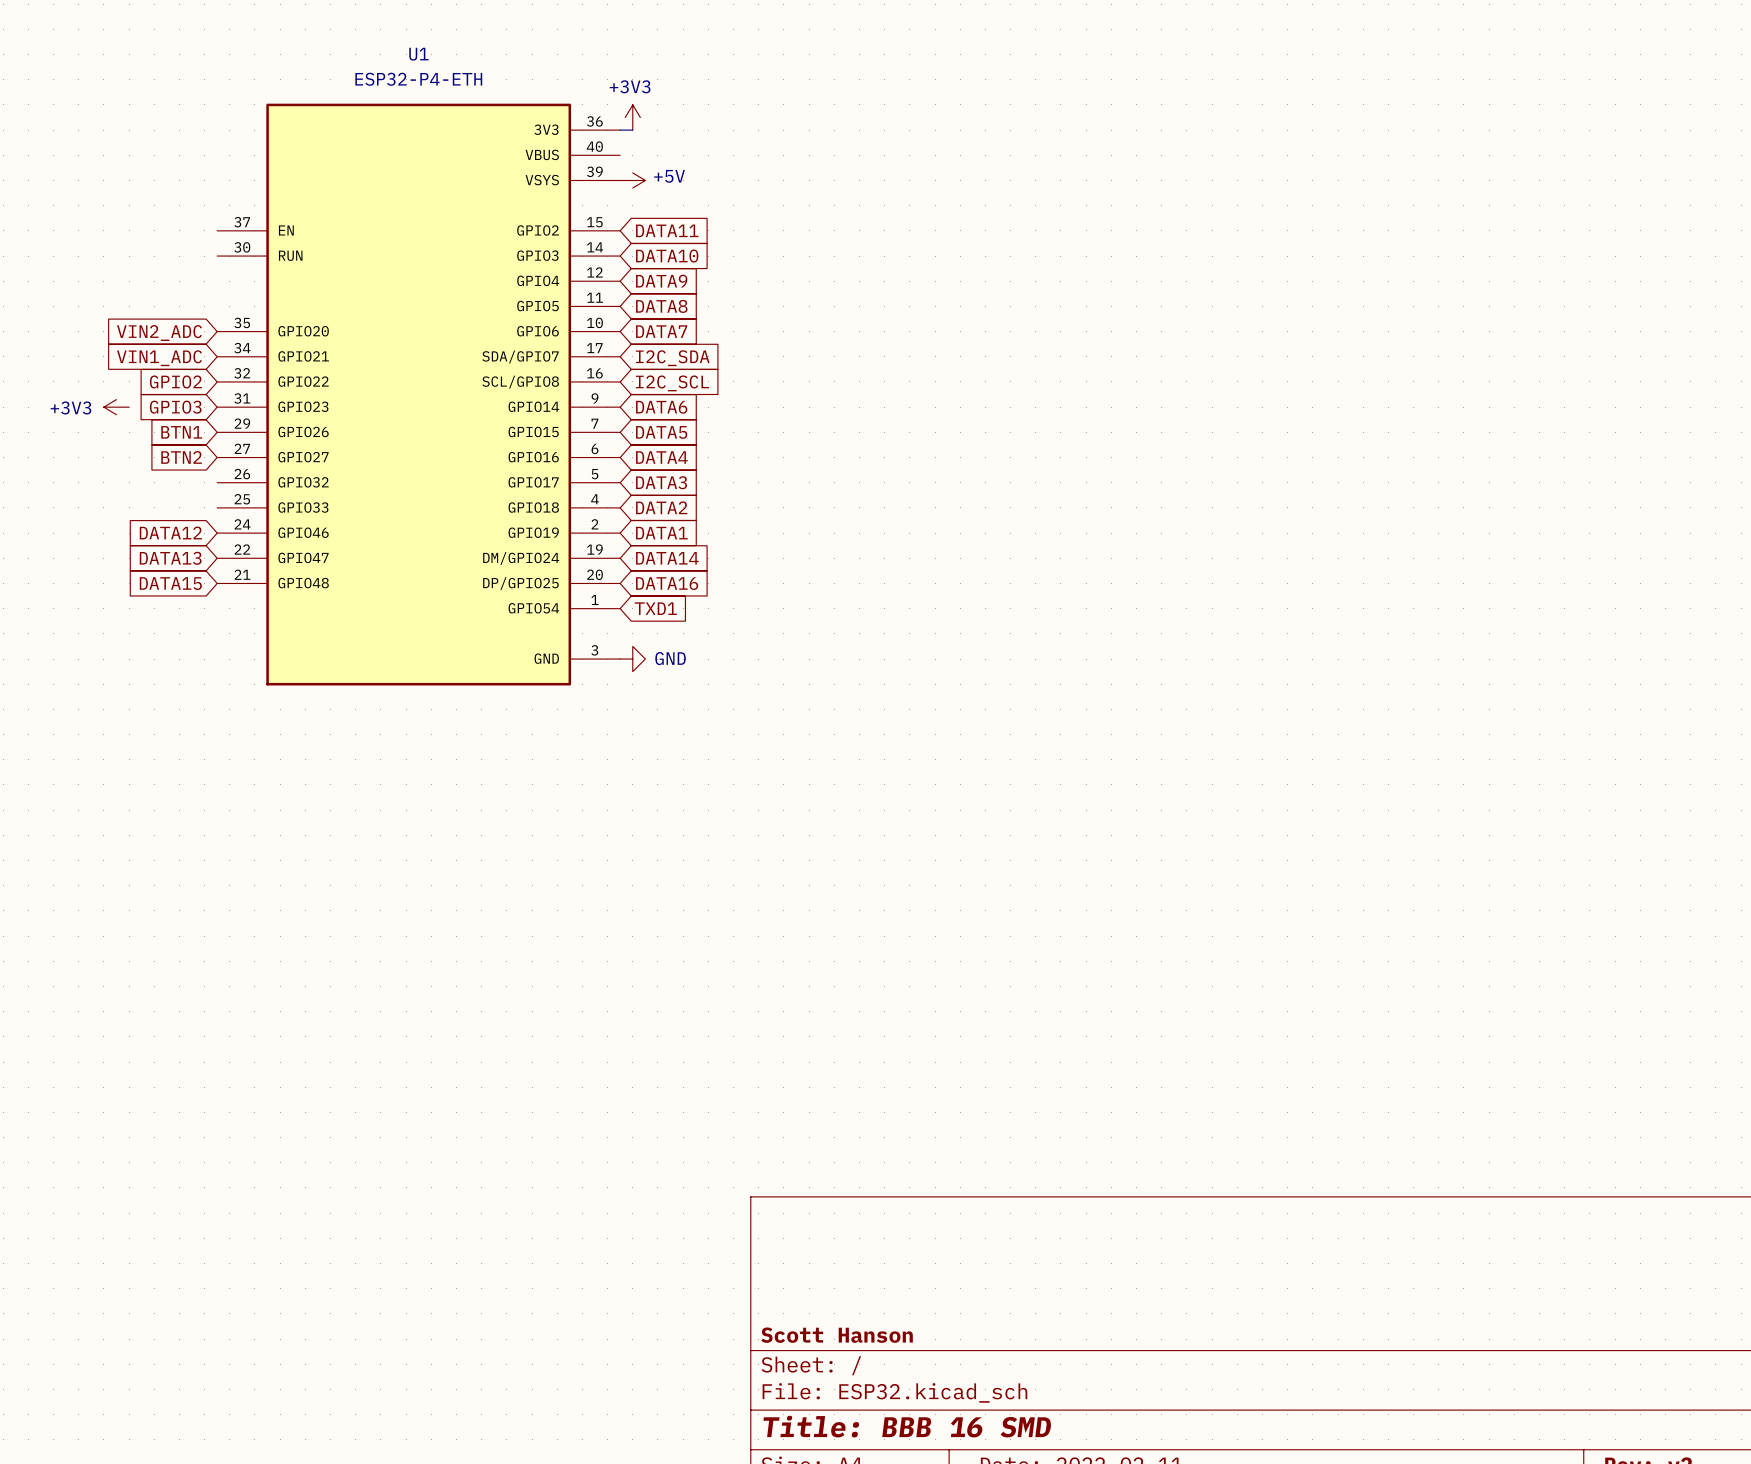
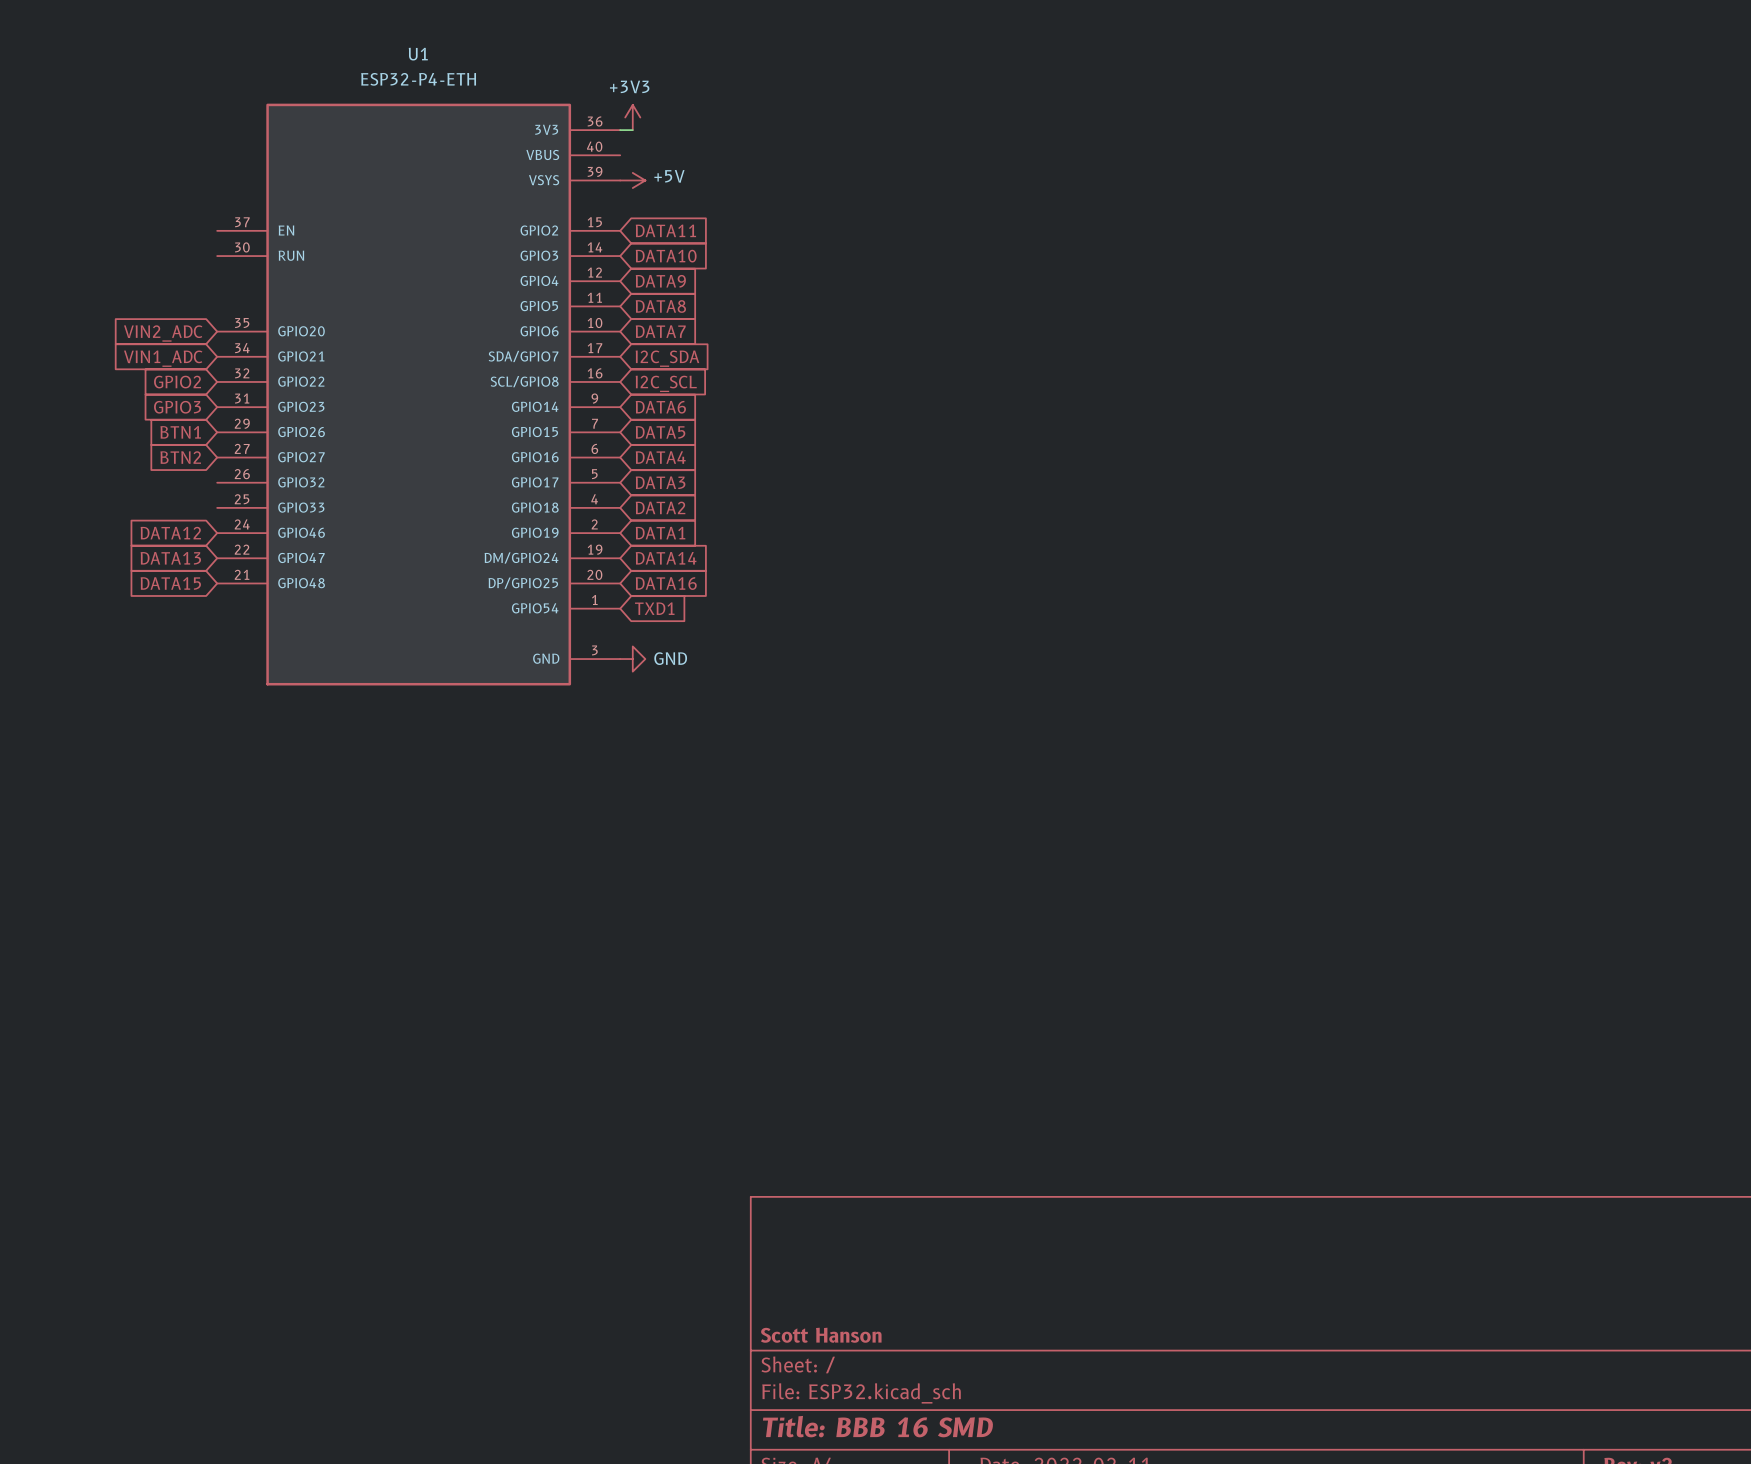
power symbol: +3V3 (116, 407) -> none

